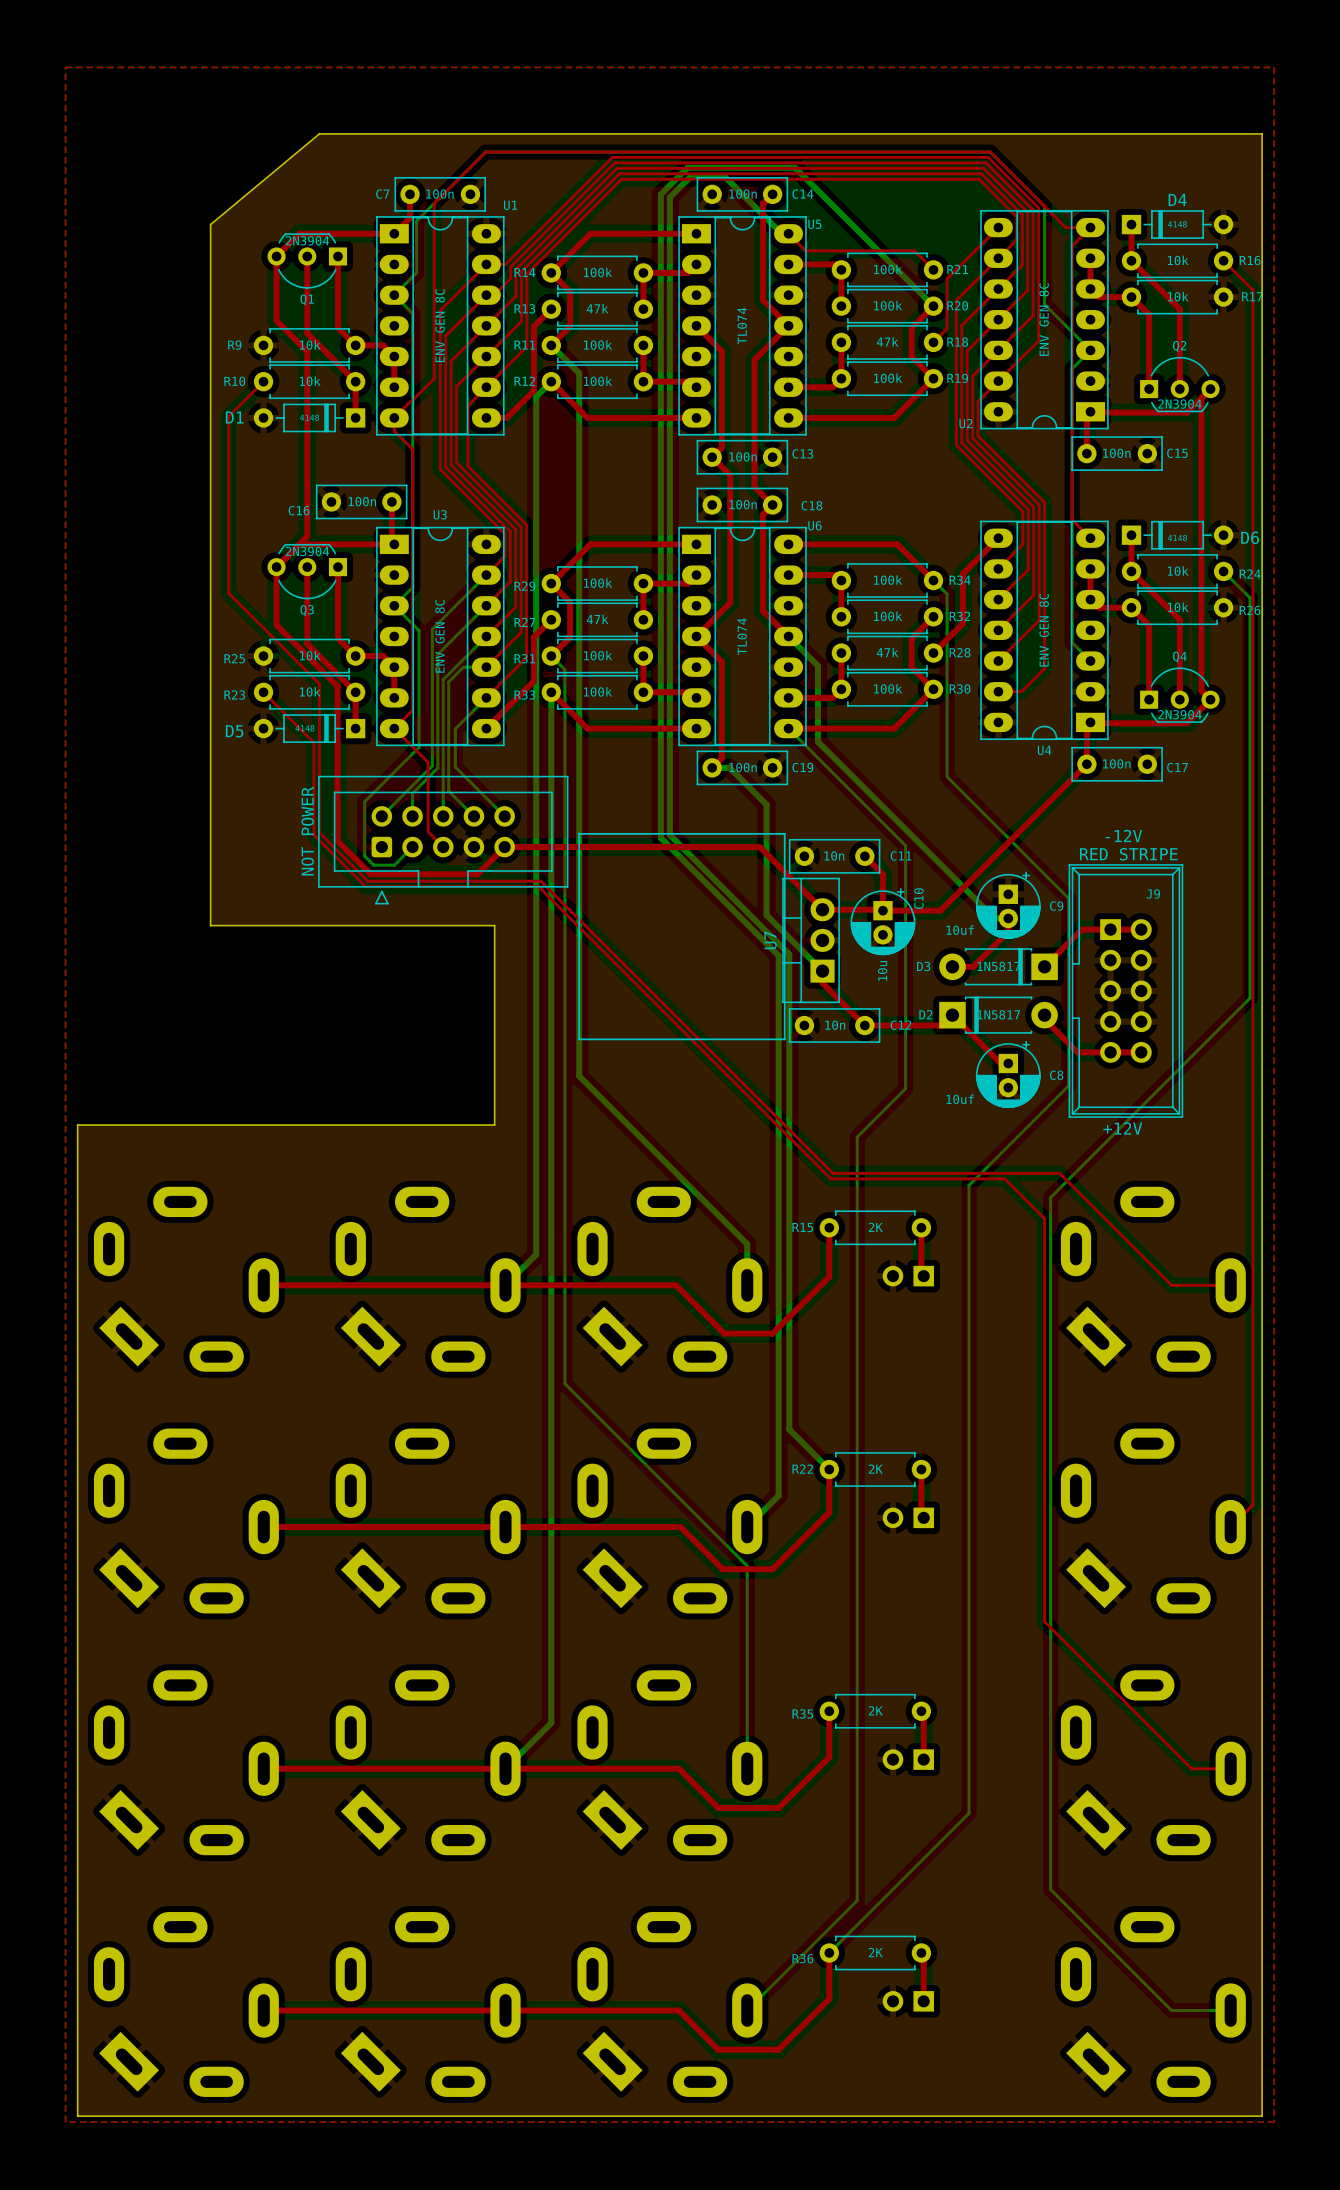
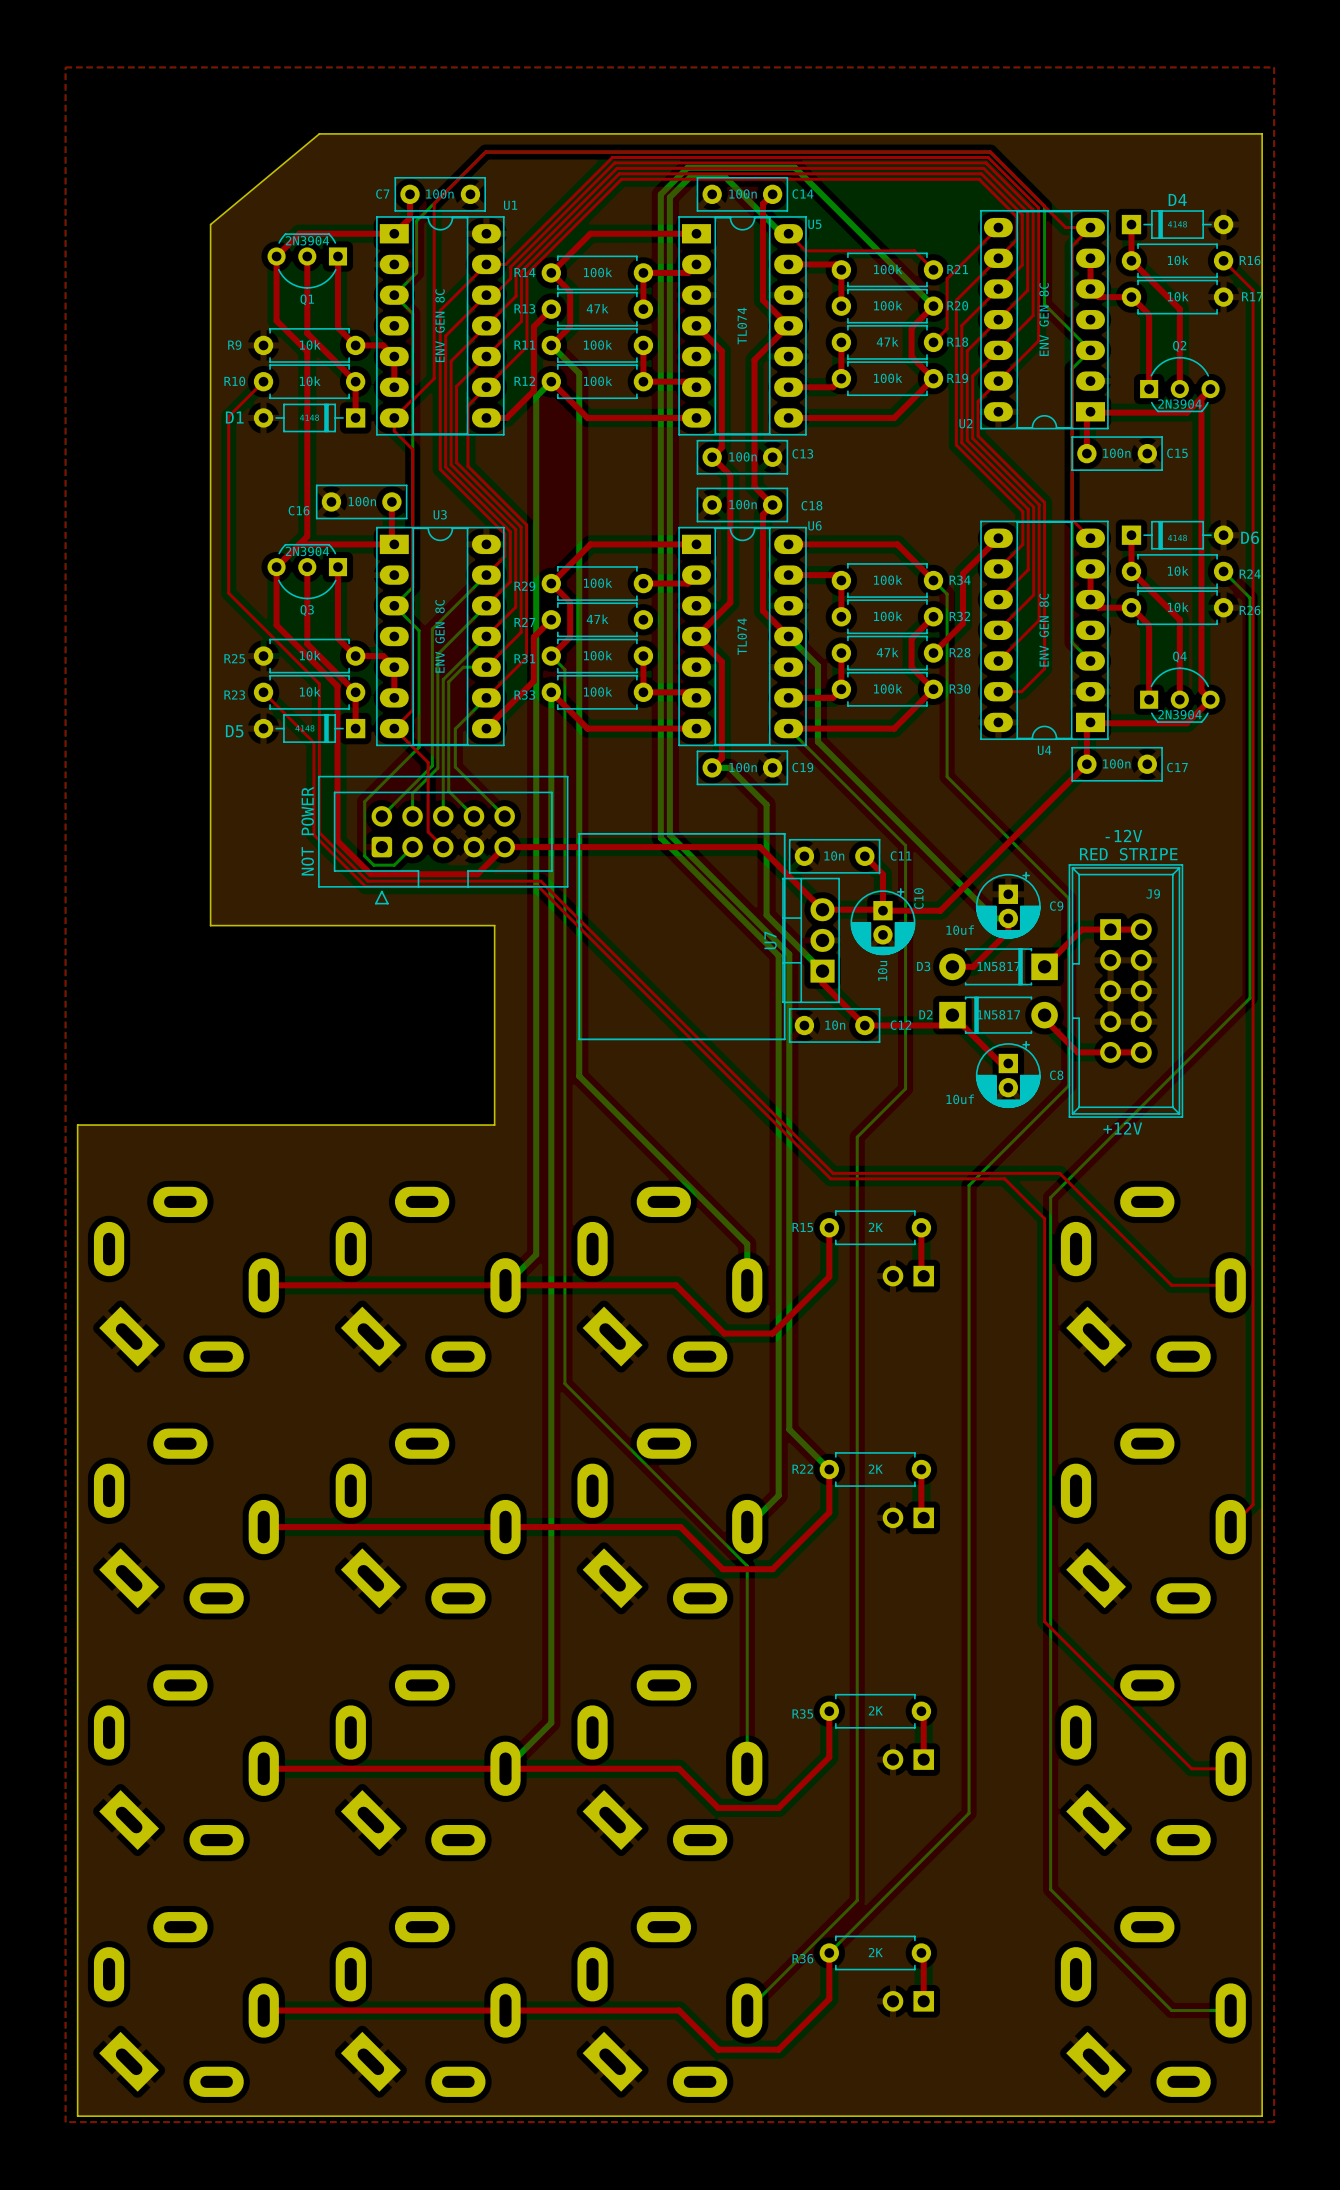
top track: (643, 583) (643, 619) -> none

